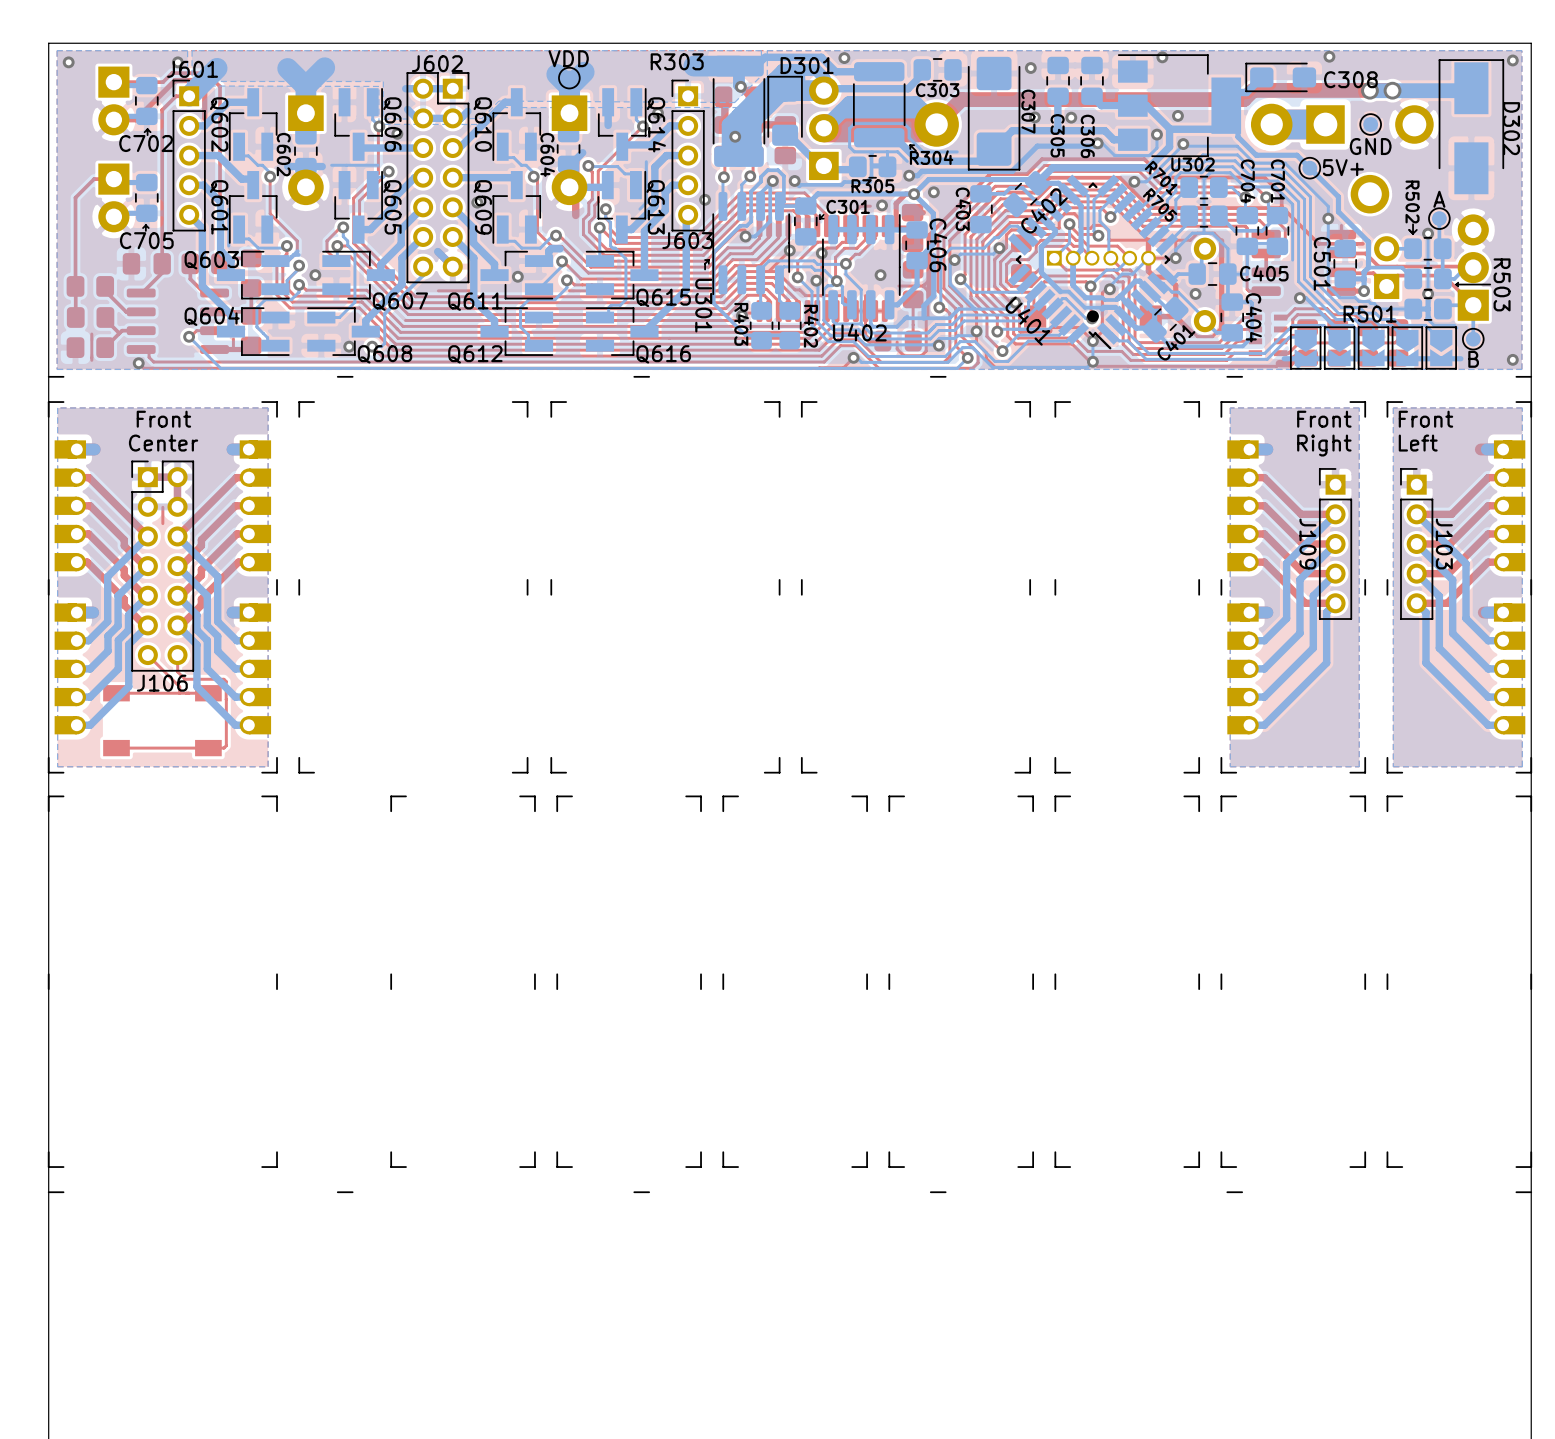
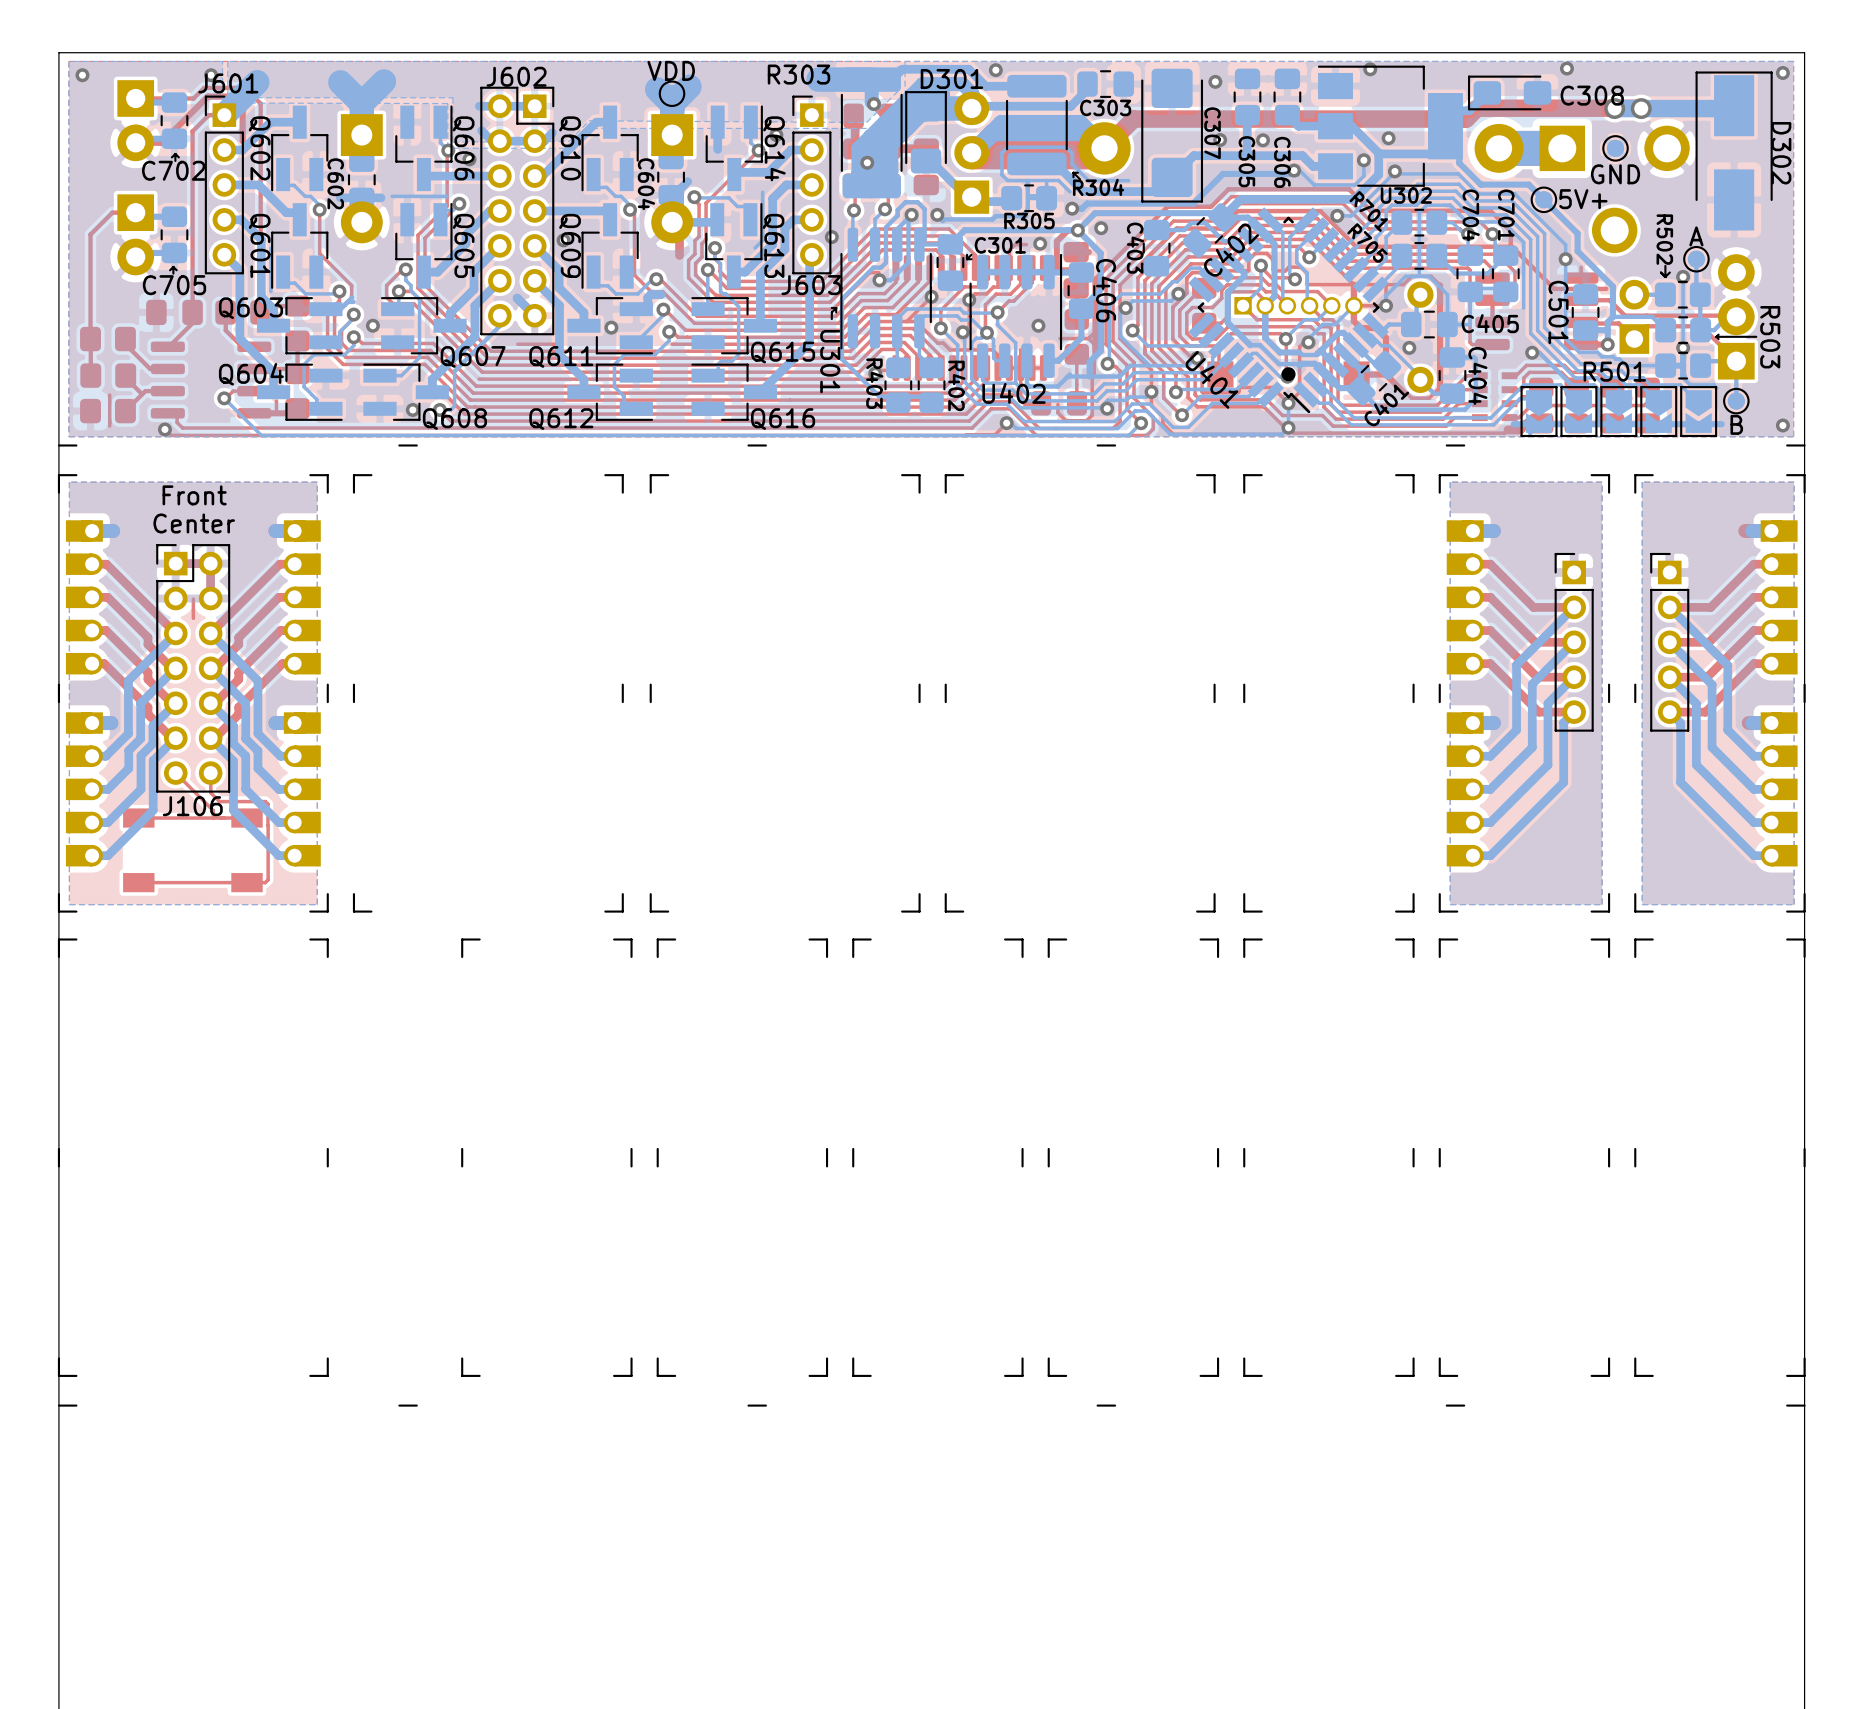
text: Front (1324, 419) -> none
text: Front (1425, 419) -> none
text: Left (1418, 443) -> none
text: Right (1324, 445) -> none
J109 name: J109 (1307, 544) -> none
J103 name: J103 (1444, 544) -> none

